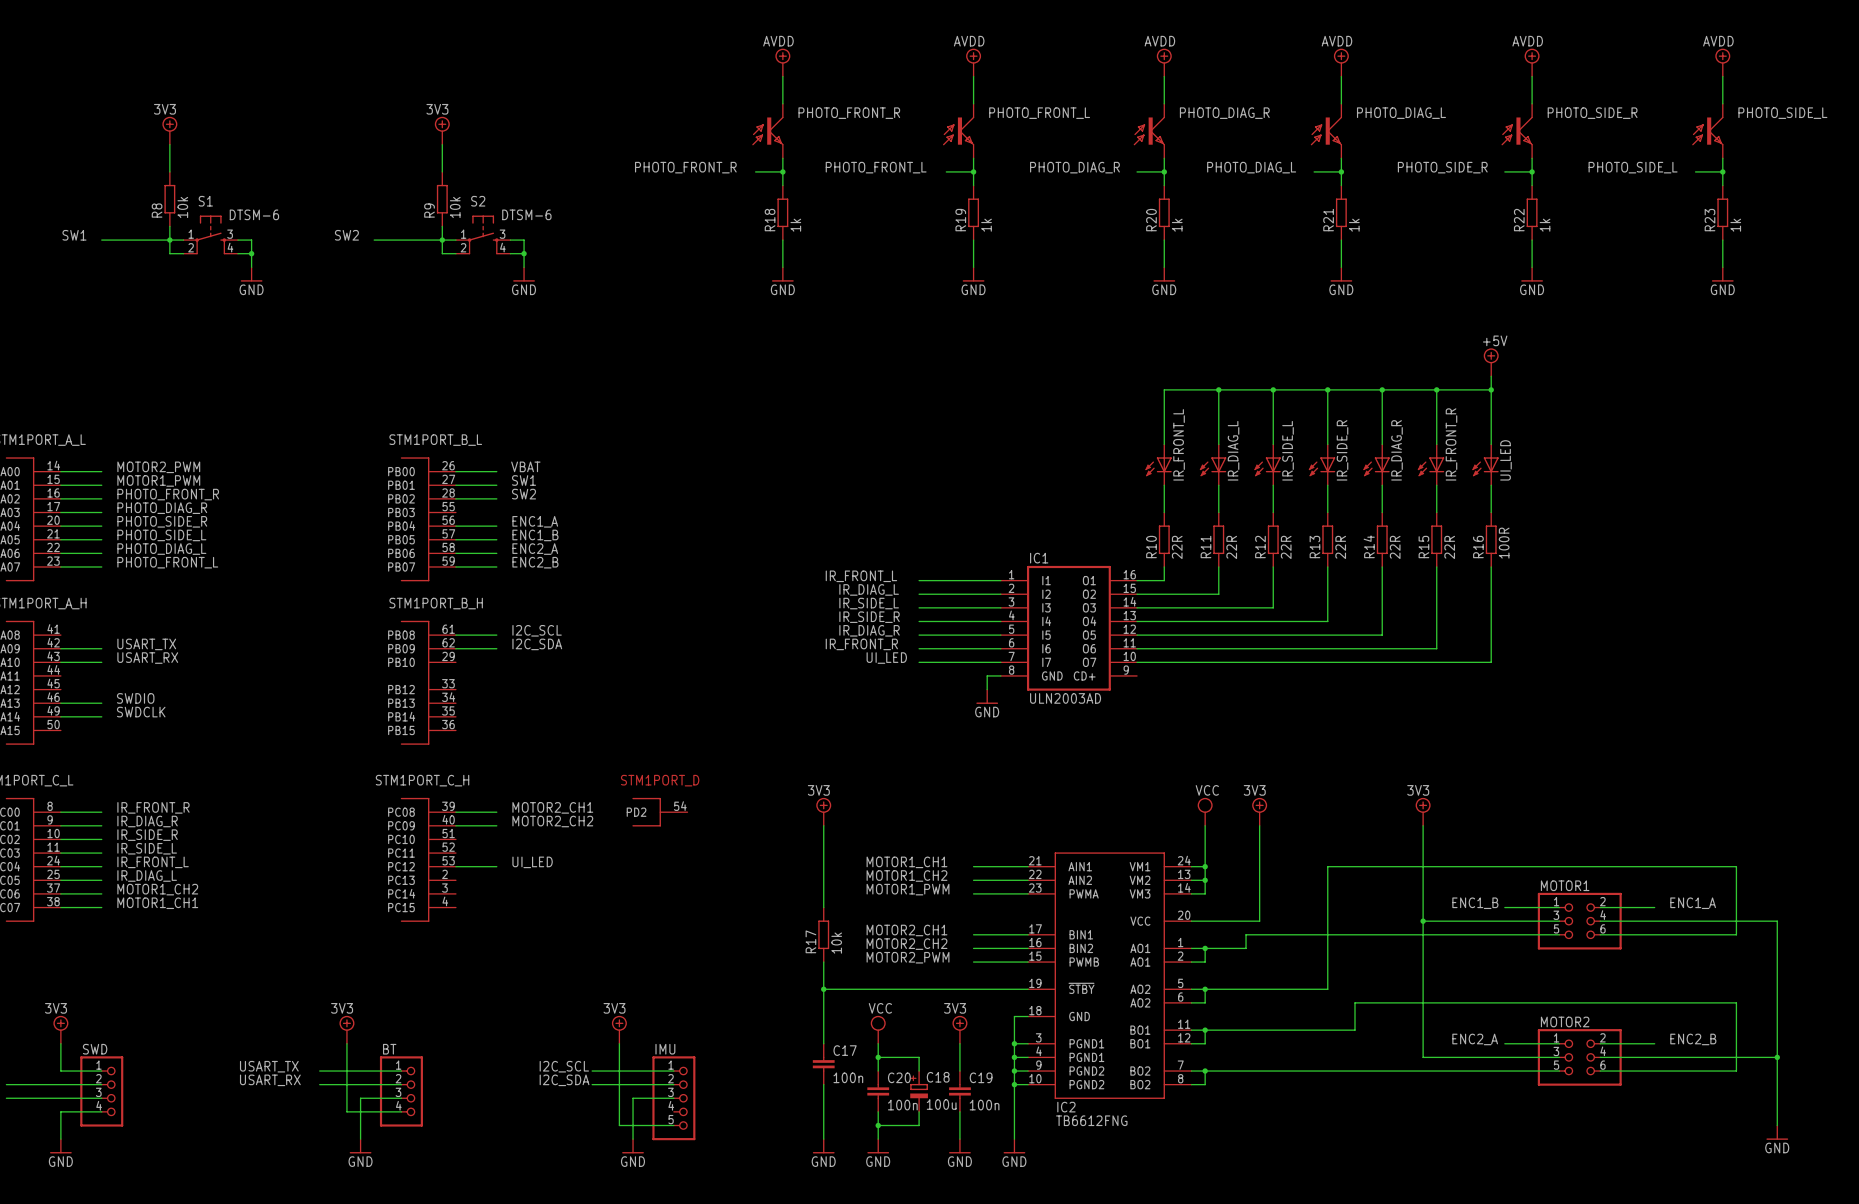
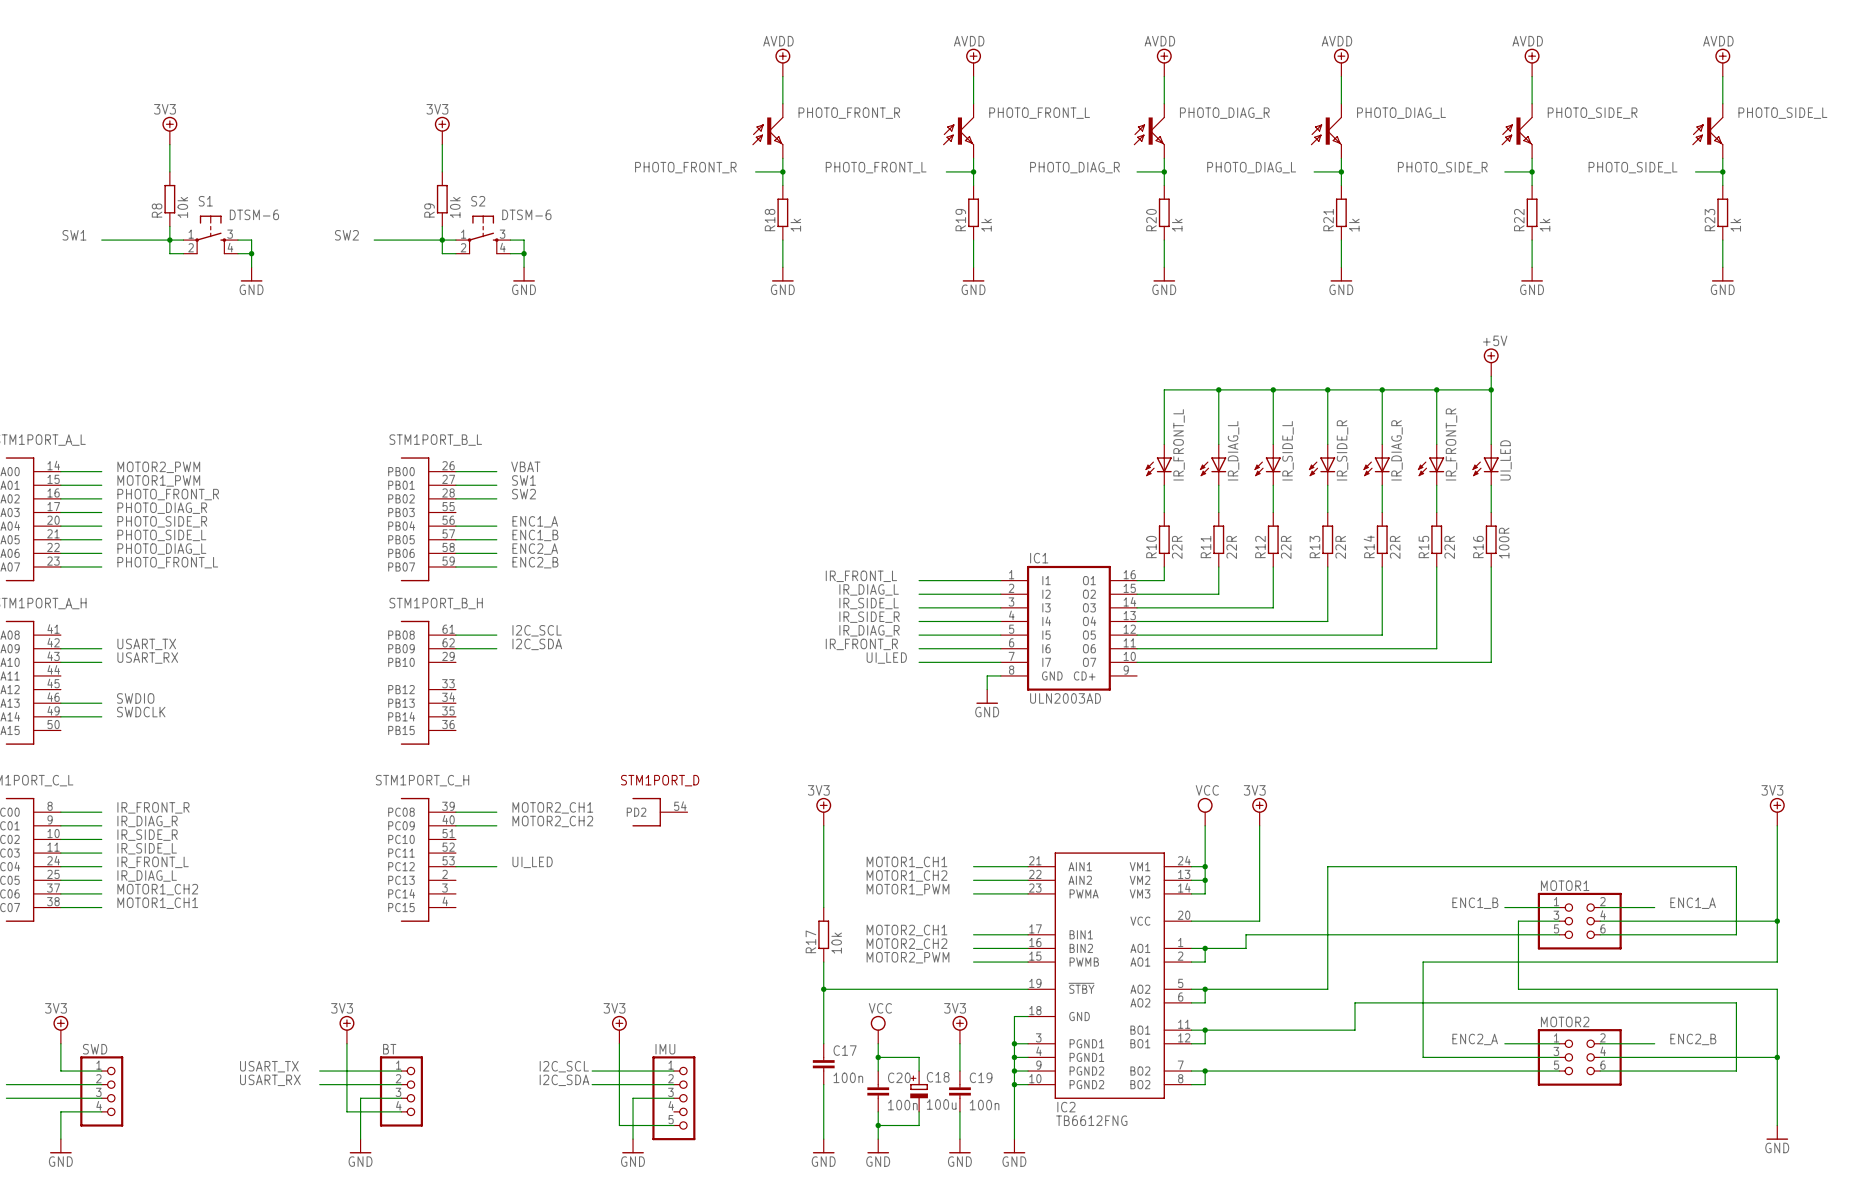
power symbol: 3V3 (1423, 811) -> none
power symbol: none -> 3V3 (1777, 811)
wire: (1423, 825) (1423, 962) -> (1777, 962) (1423, 962)
wire: none -> (1777, 825) (1777, 921)
wire: (1423, 921) (1518, 921) -> none
junction: (1423, 921) -> none
junction: none -> (1777, 921)
wire: (1777, 962) (1777, 989) -> (1518, 921) (1518, 989) (1777, 989)

